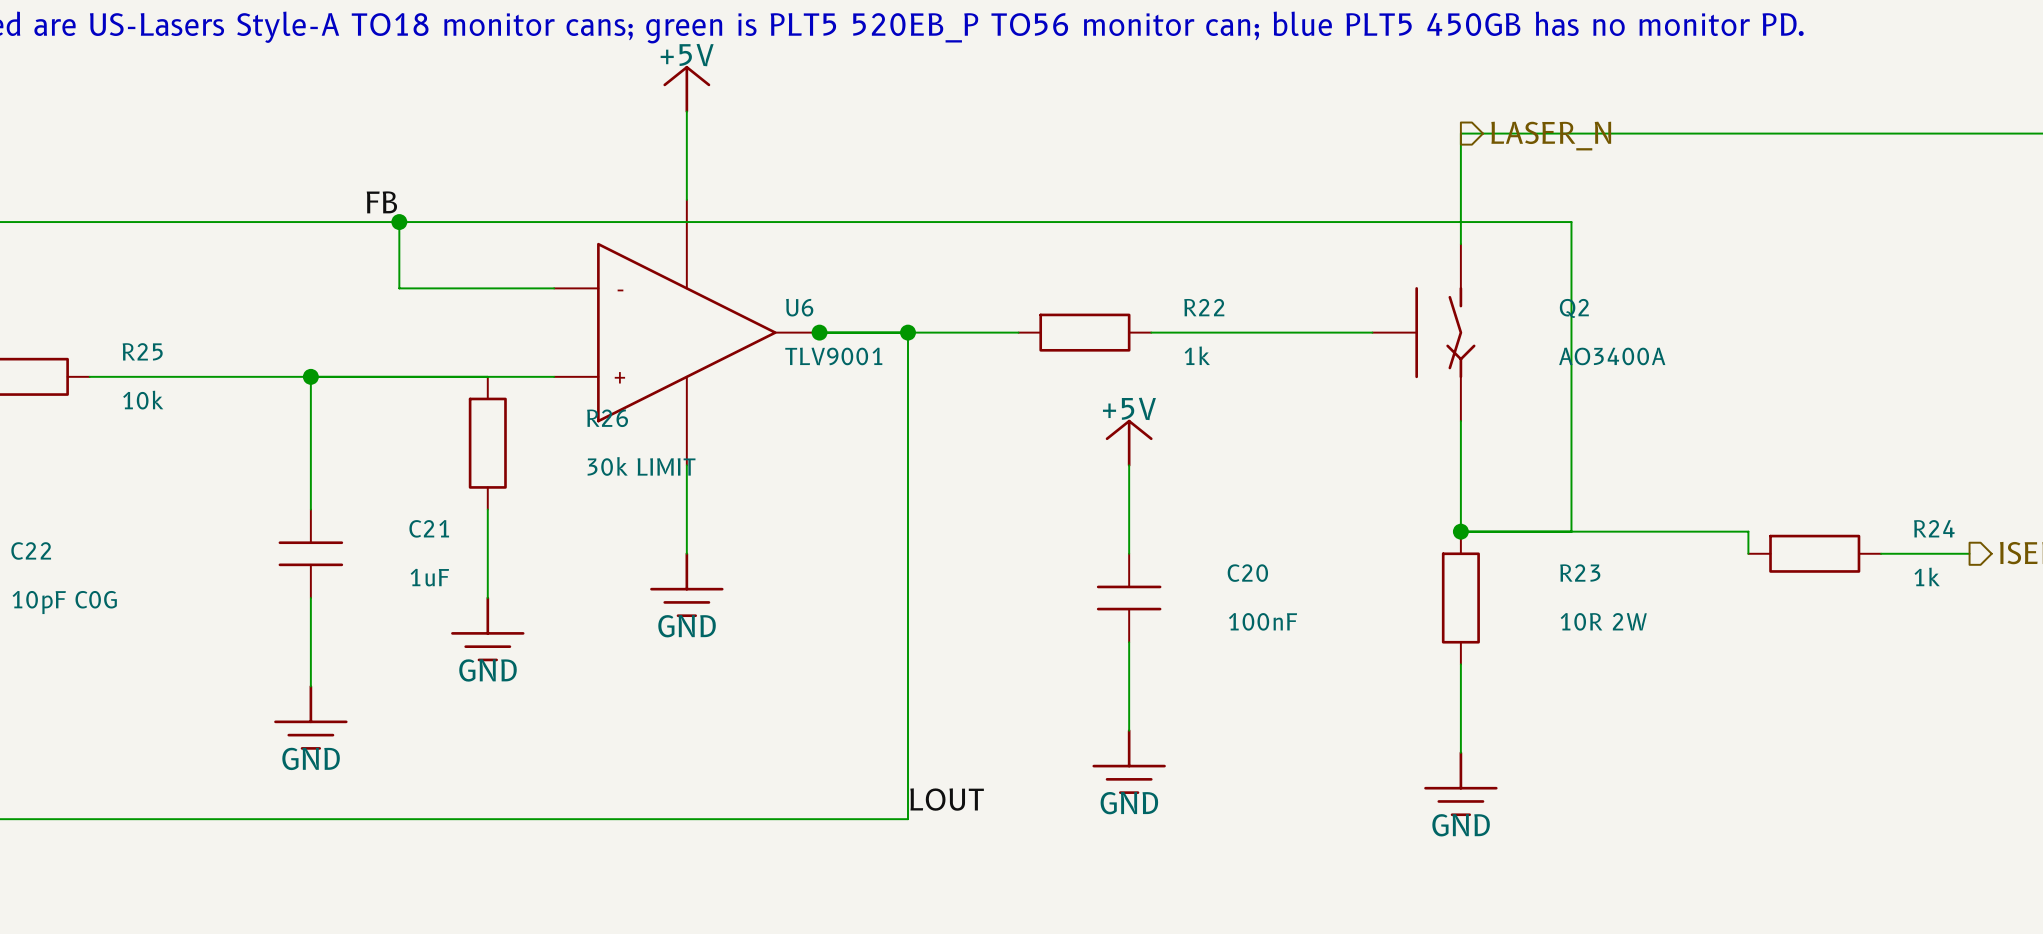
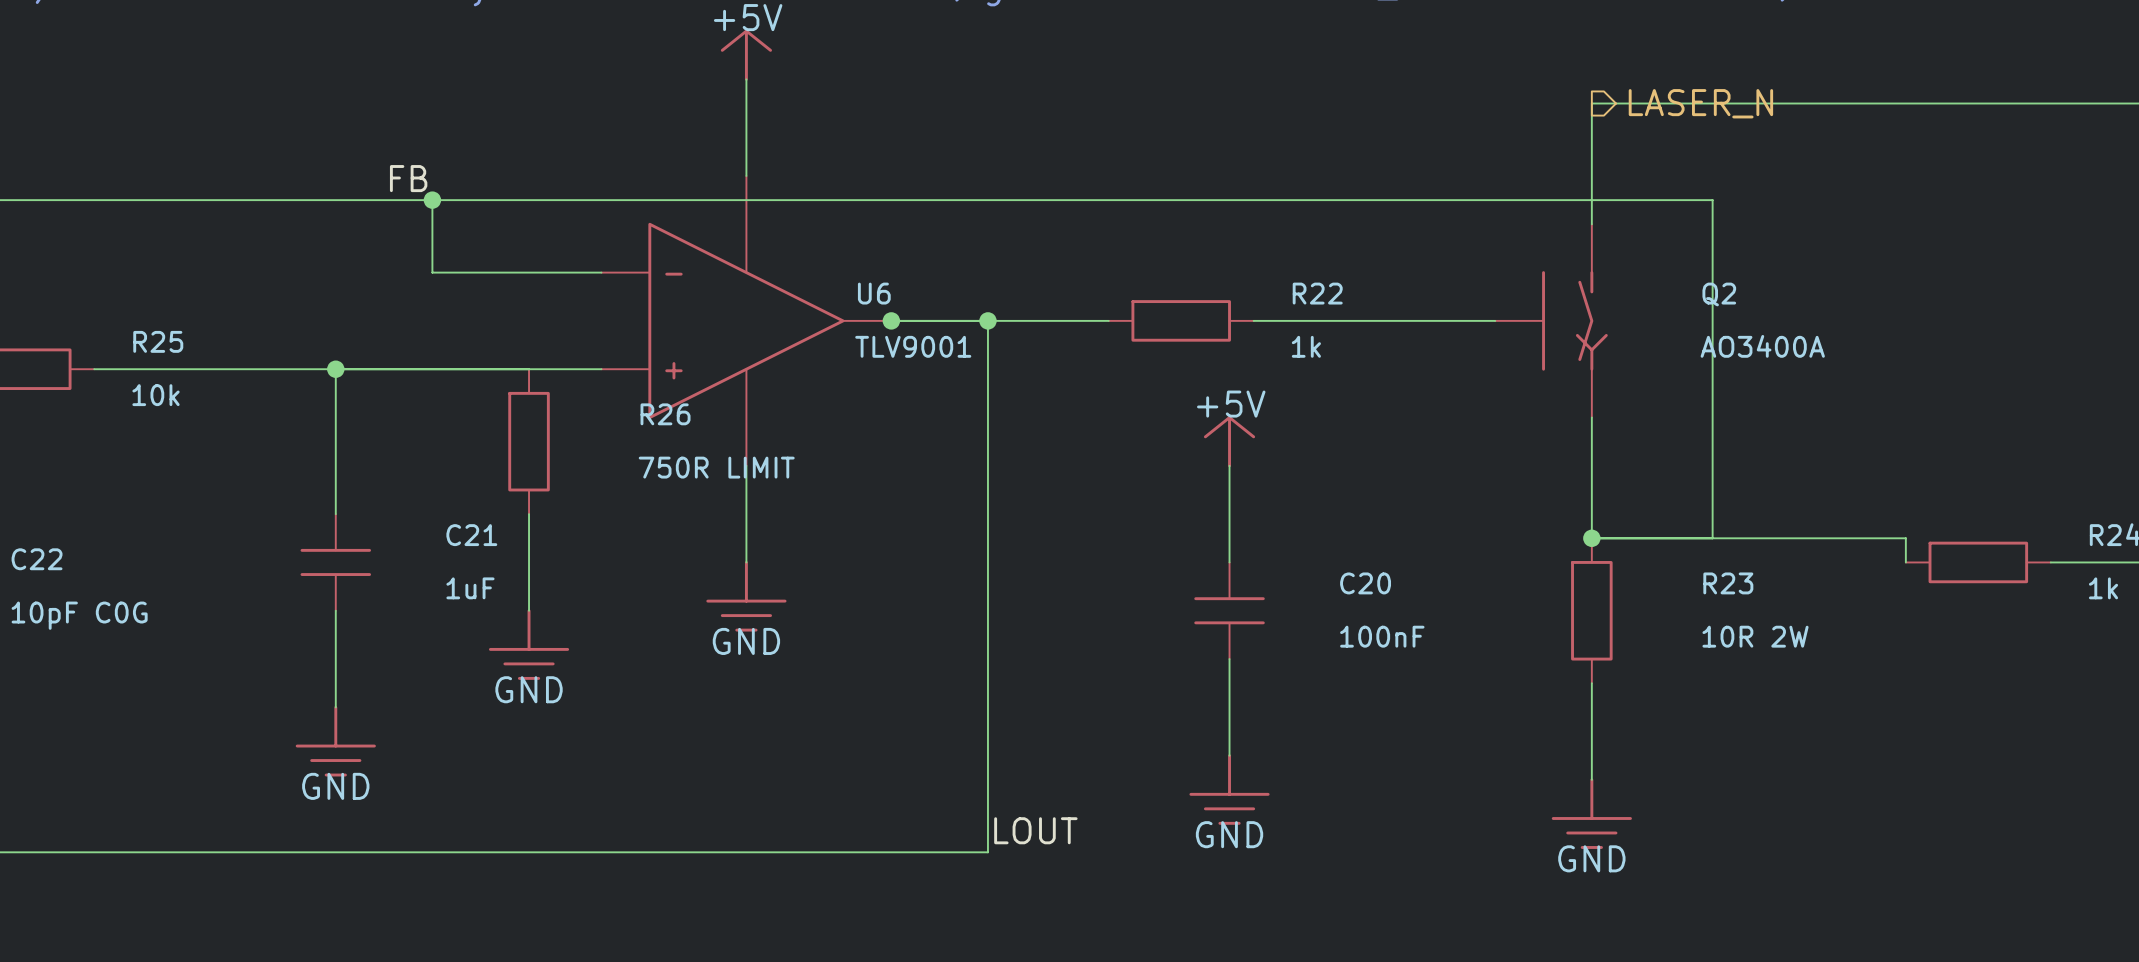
R26 value: 30k LIMIT (641, 466) -> 750R LIMIT (716, 467)

